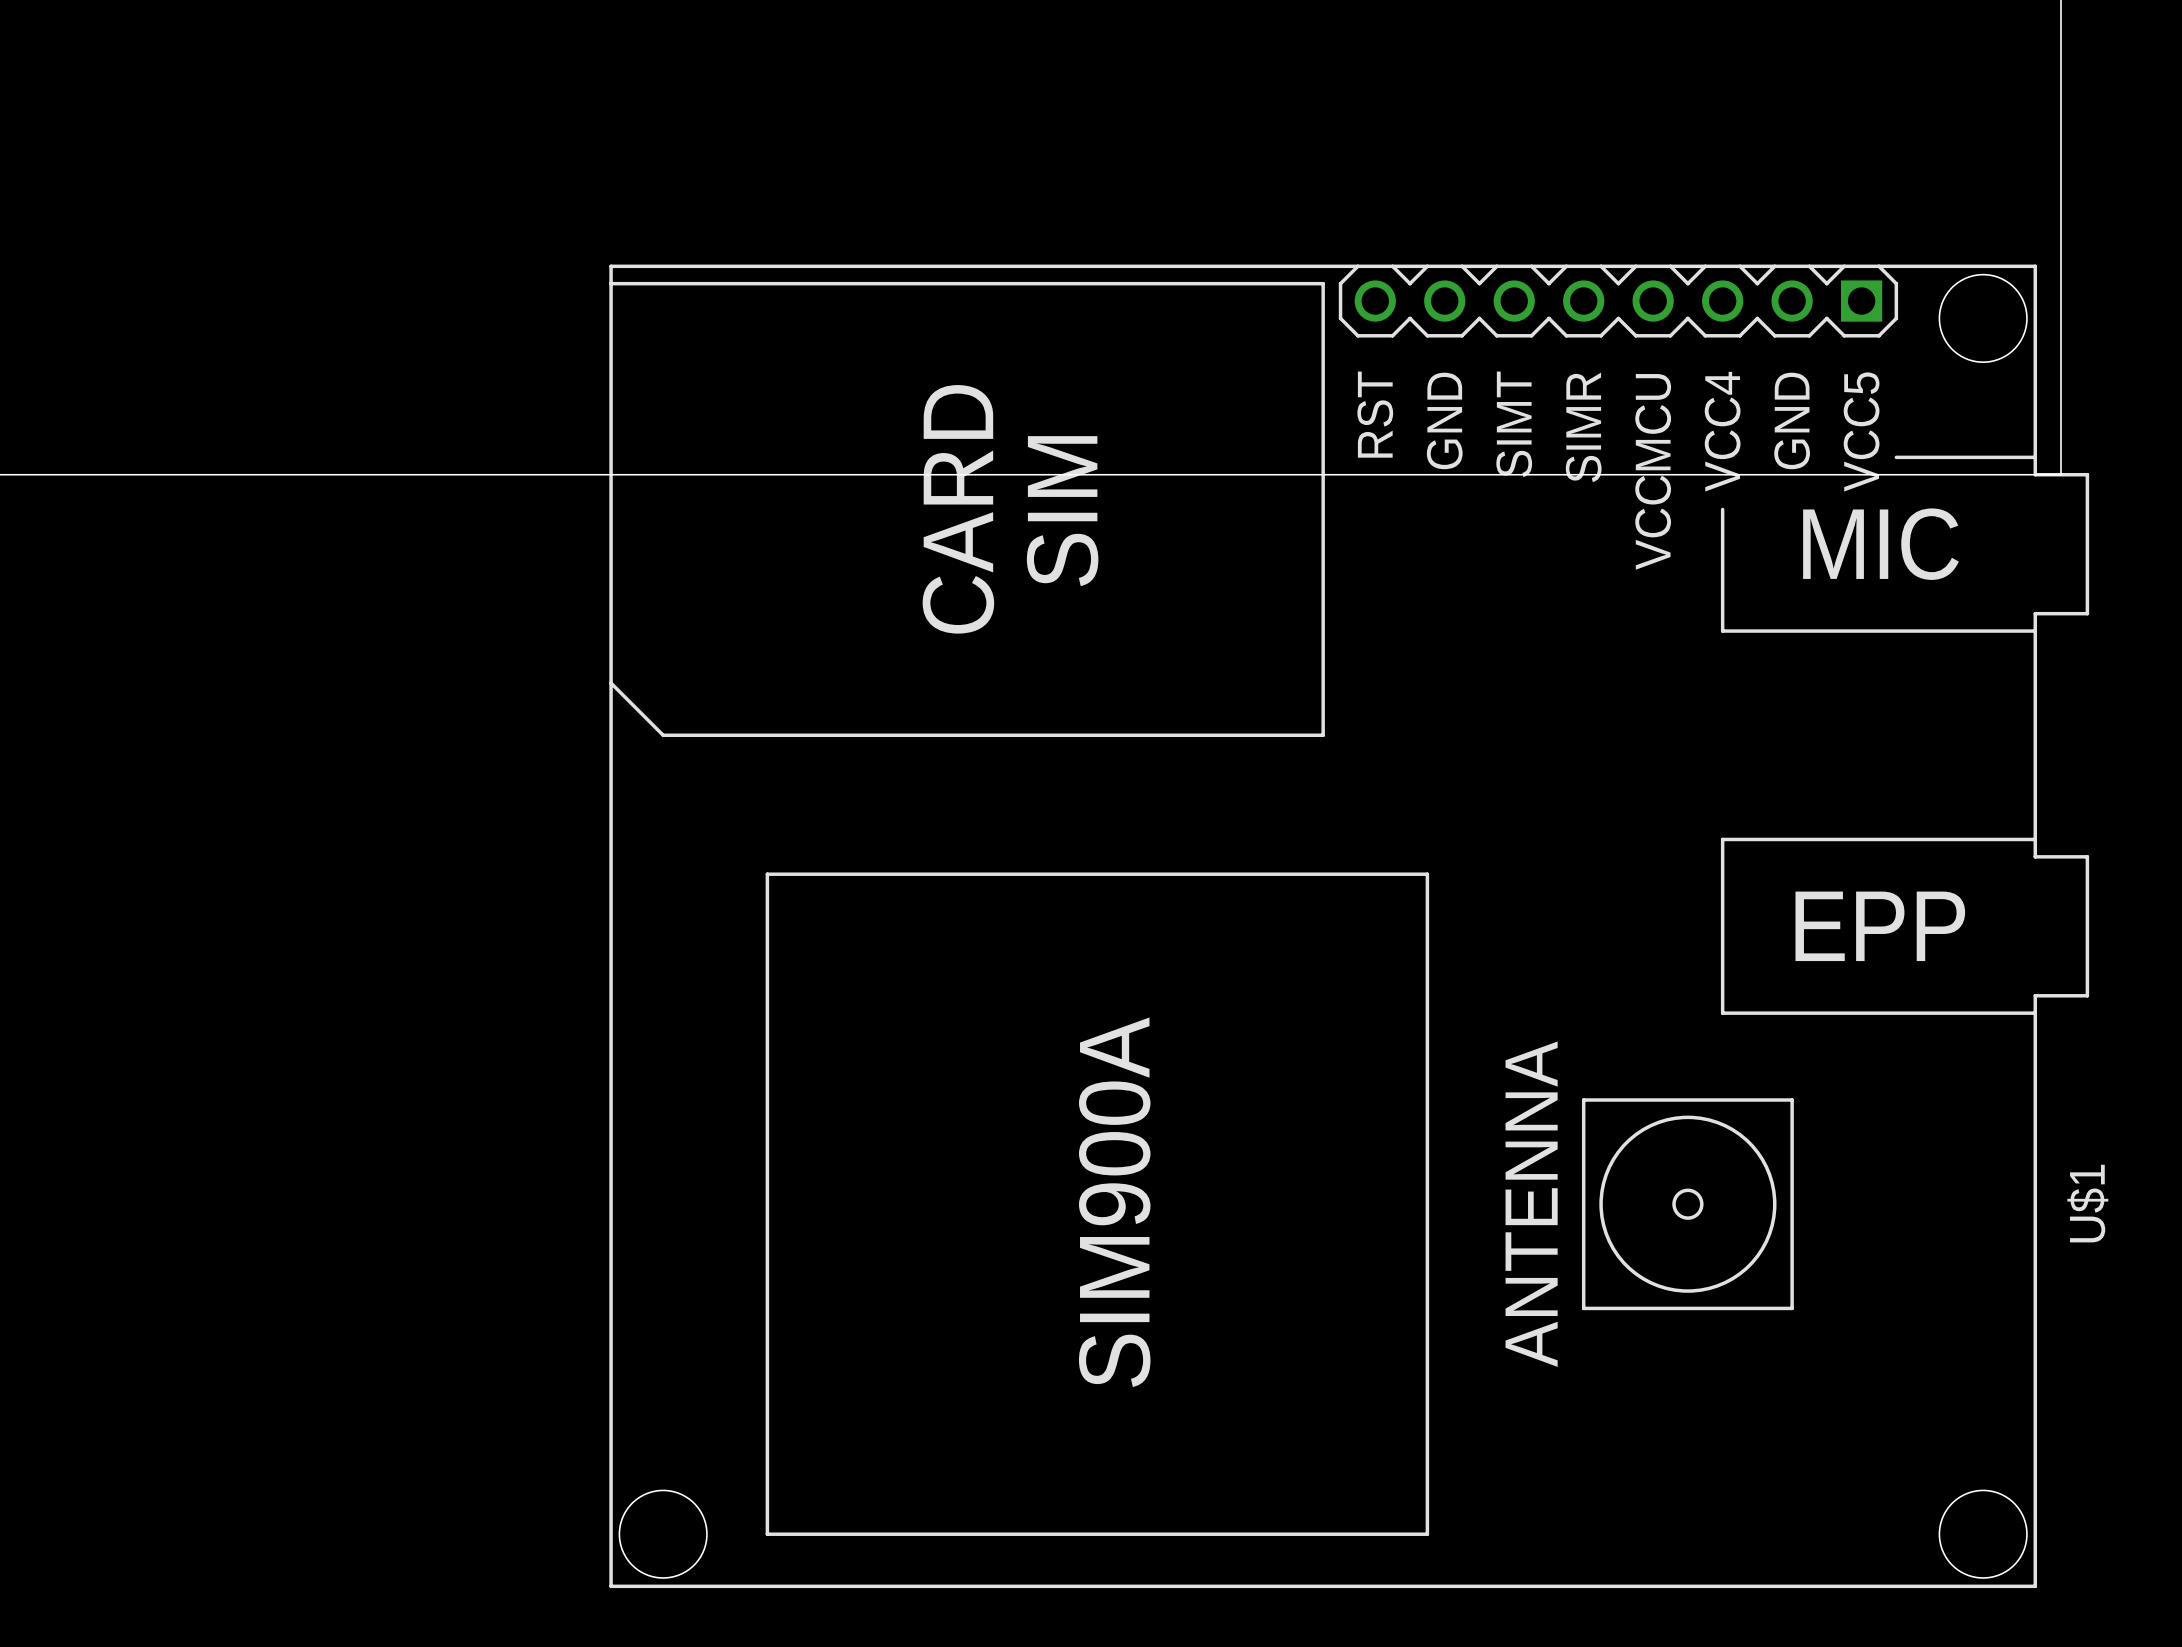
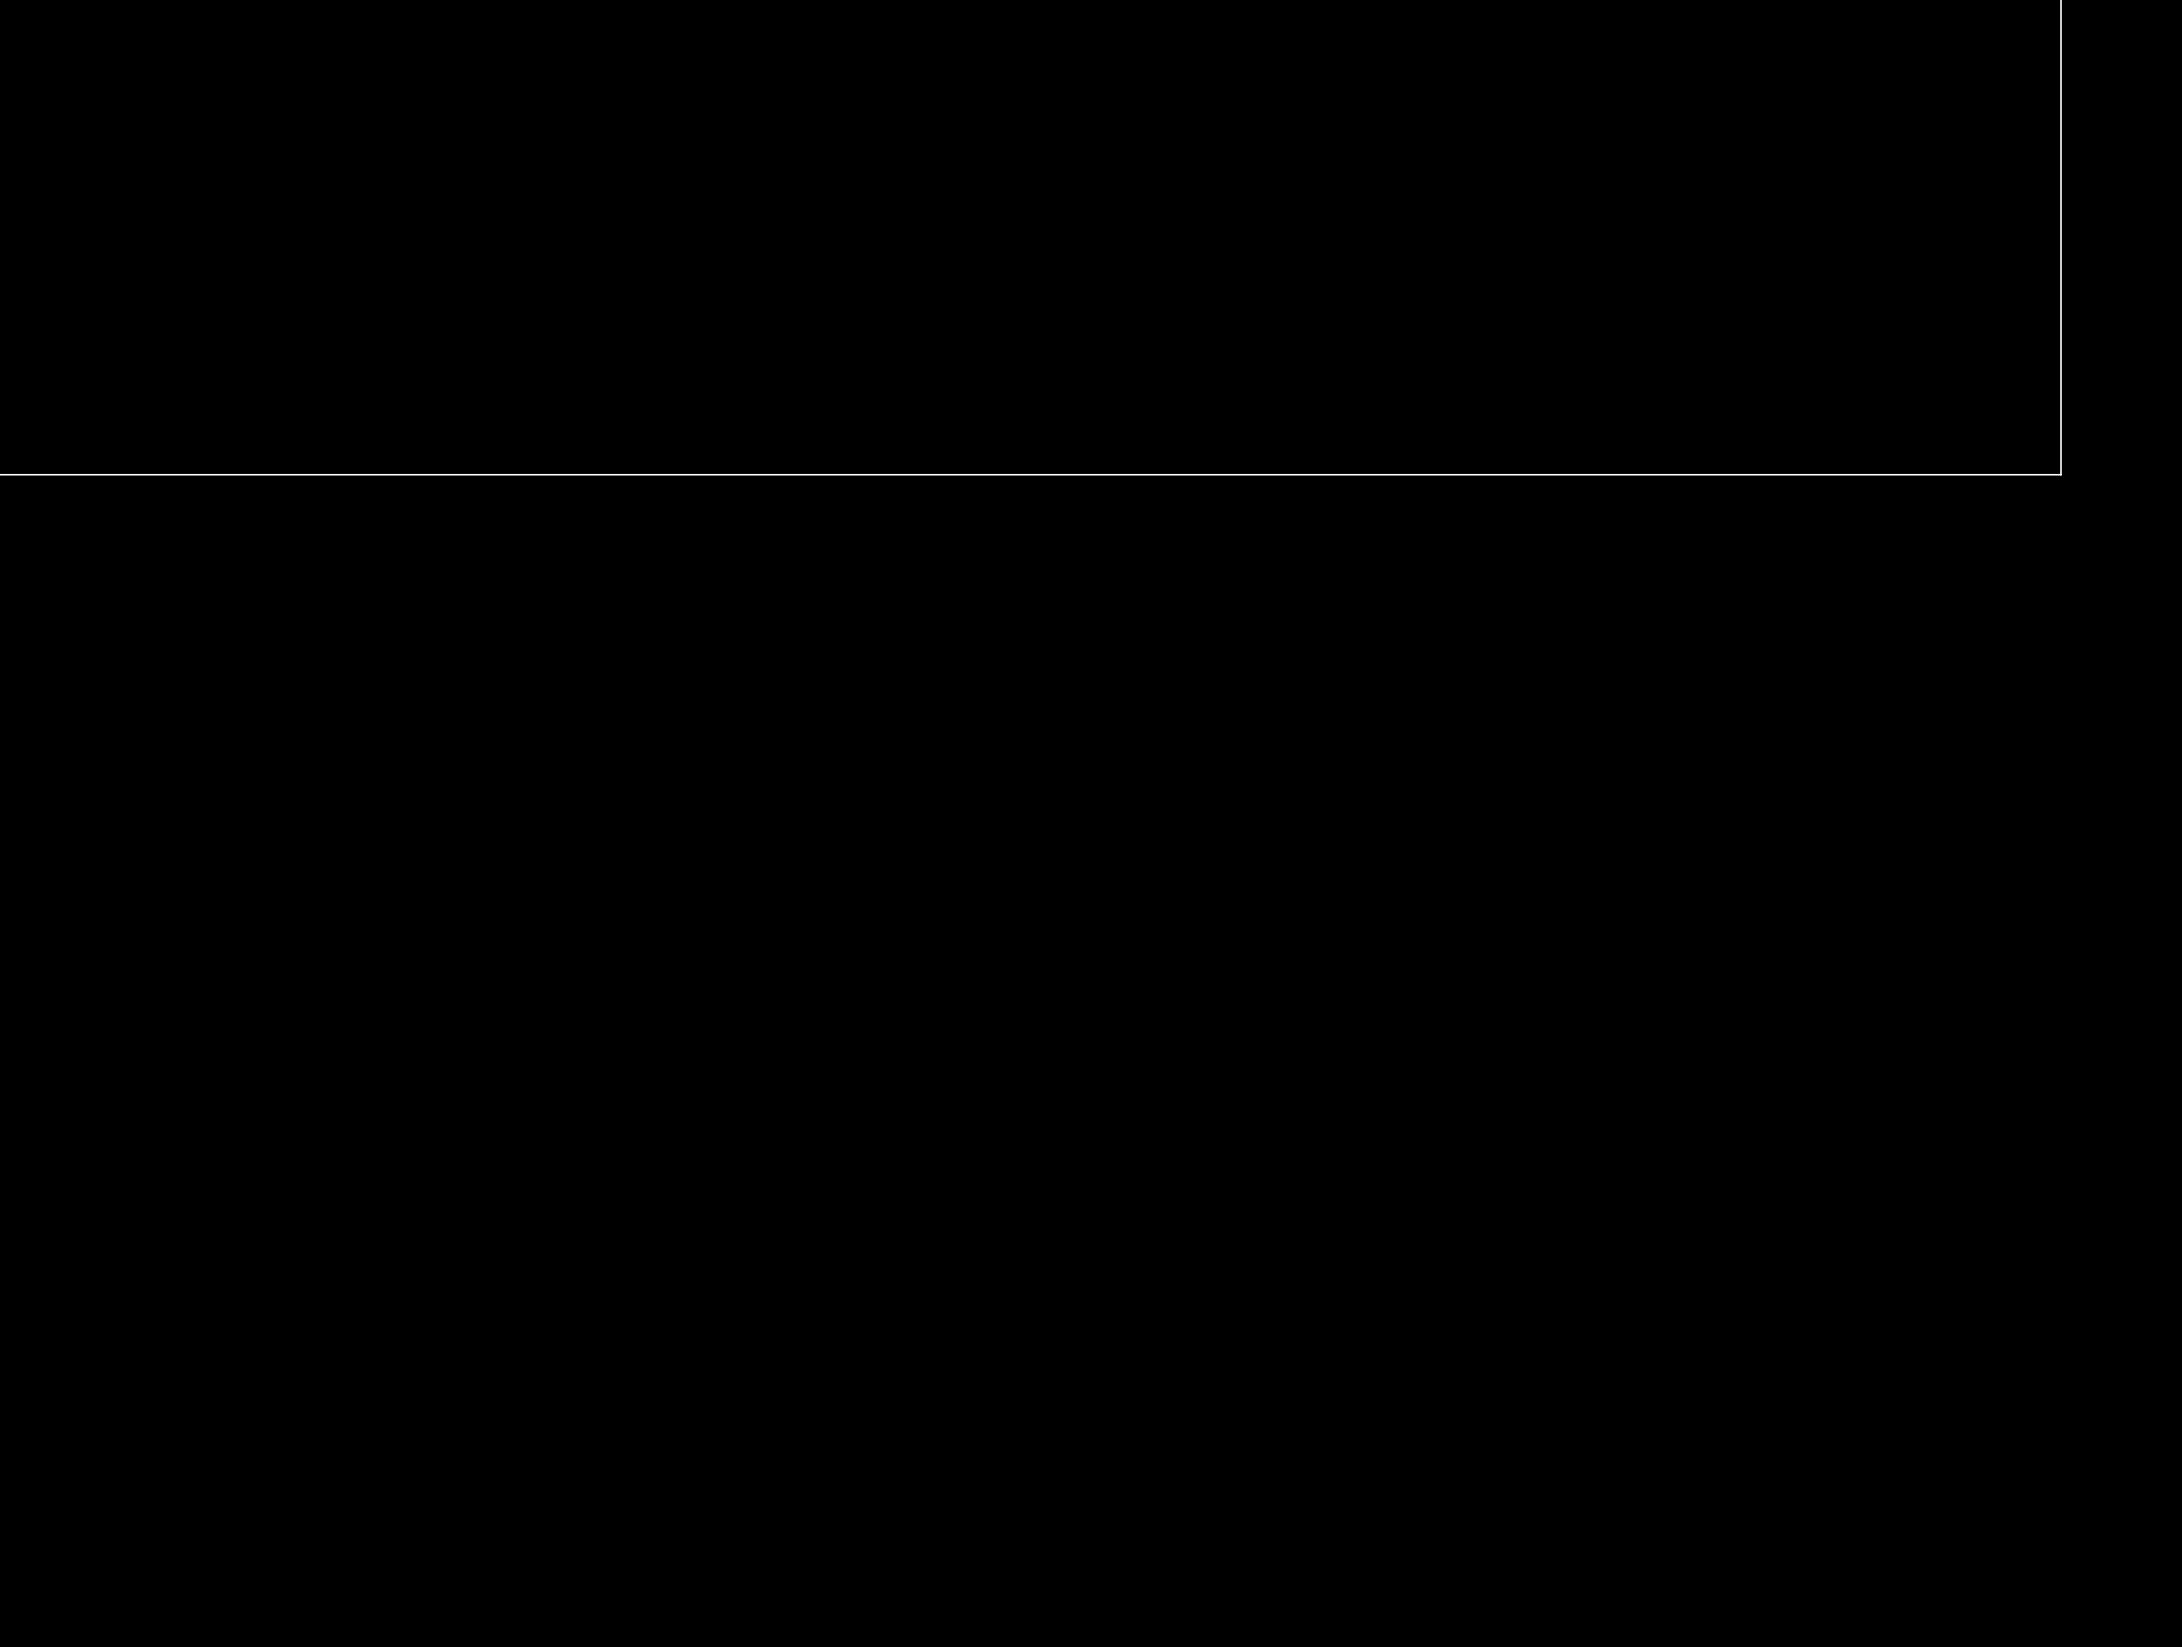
U$1: (1349, 926) -> none

